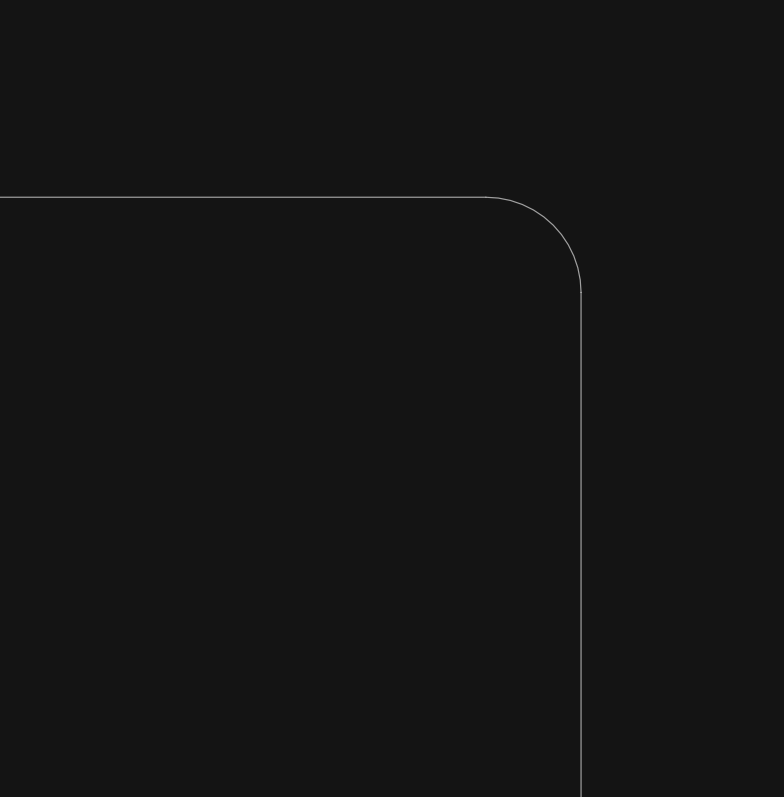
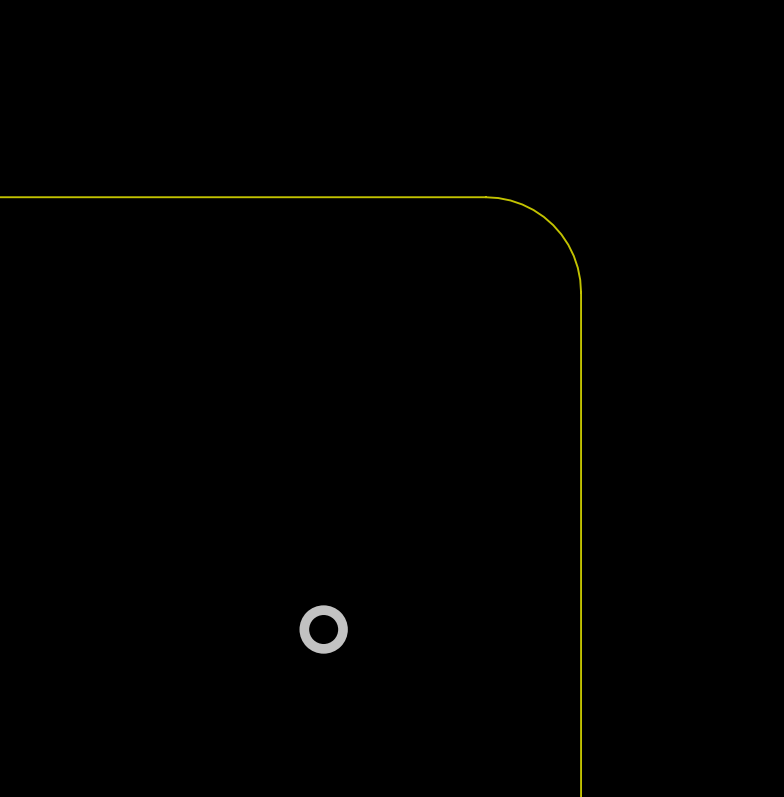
via: none -> (323, 629)

